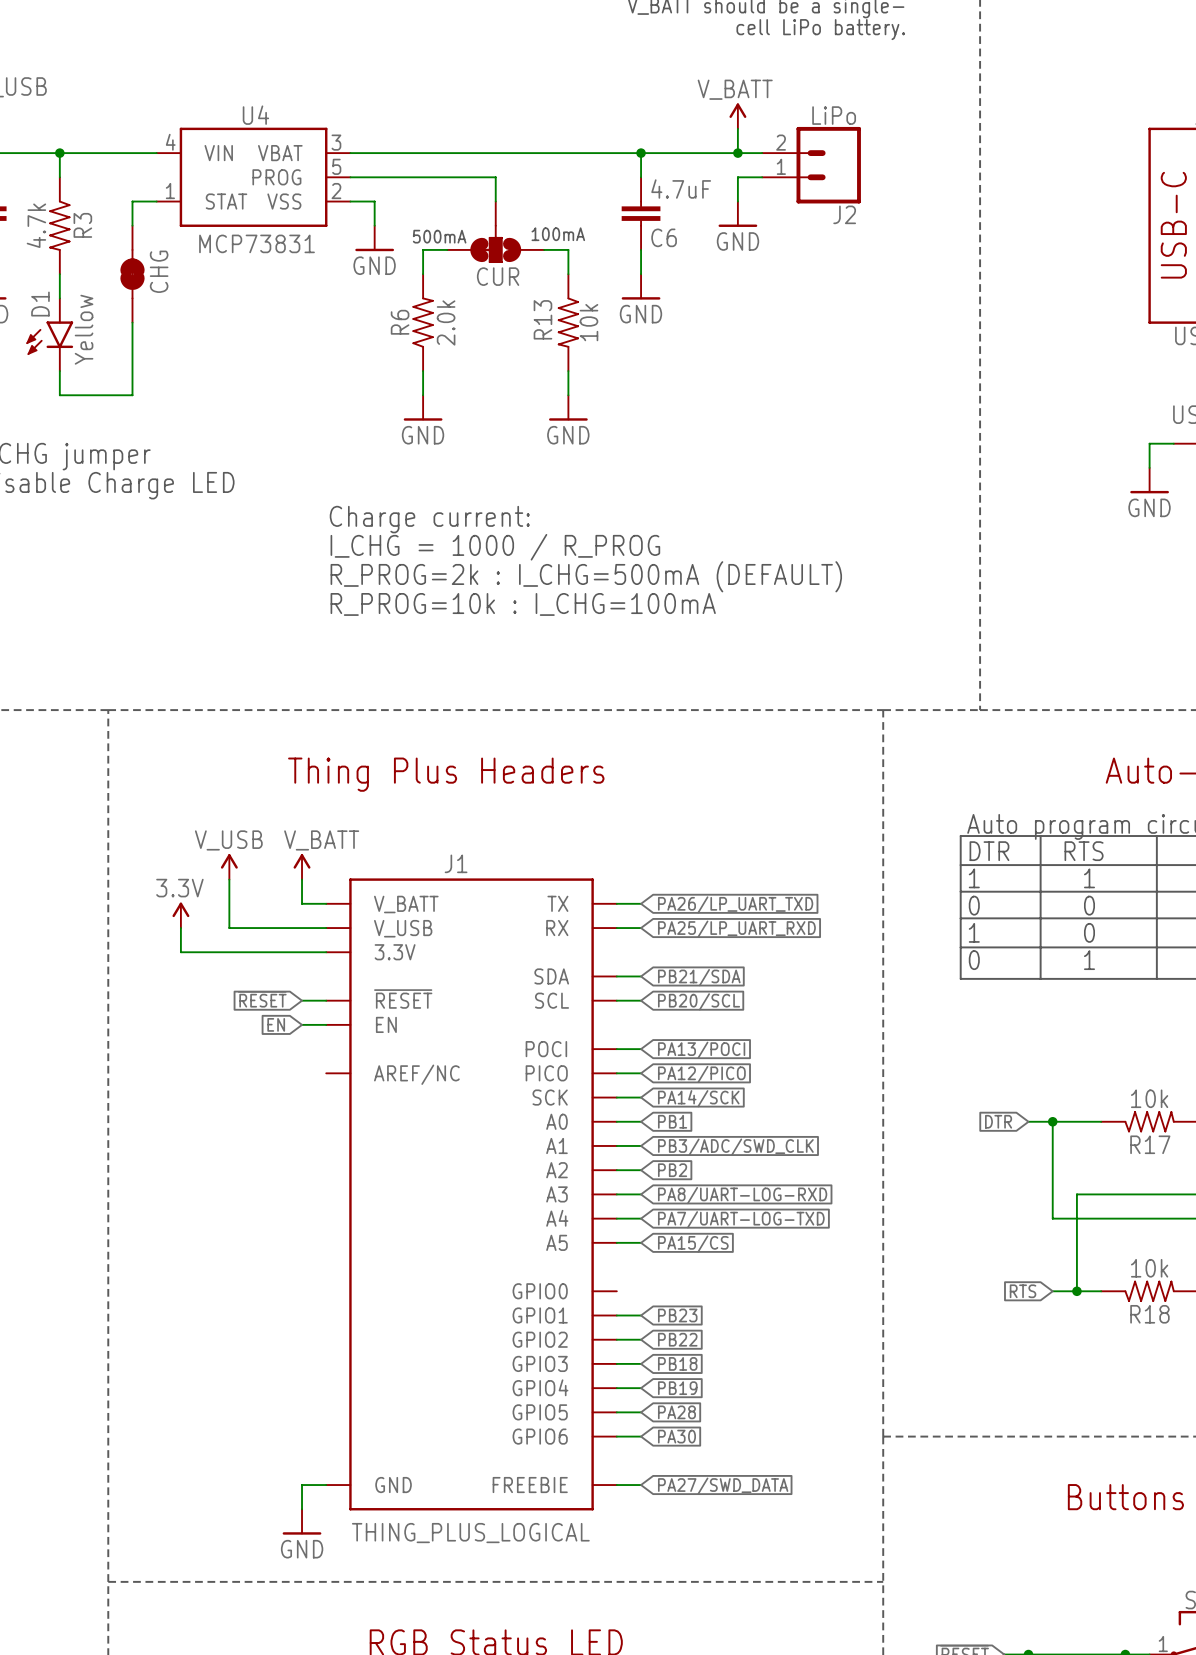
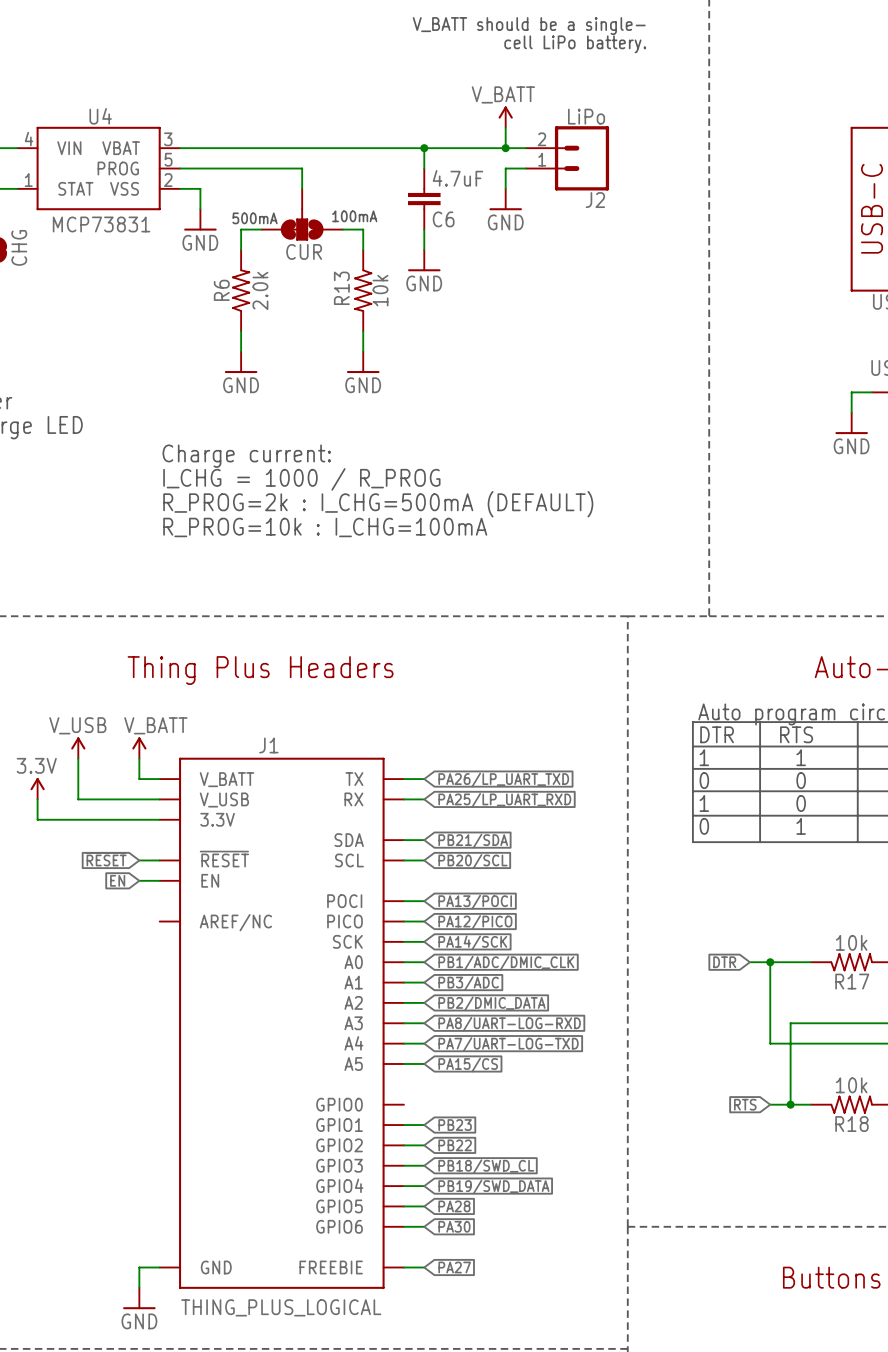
global label: PB1 (672, 1121) -> PB1/ADC/DMIC_CLK (506, 963)
global label: PB3/ADC/SWD_CLK (735, 1147) -> PB3/ADC (468, 983)
global label: PB2 (672, 1170) -> PB2/DMIC_DATA (491, 1003)
global label: PB18 (677, 1363) -> PB18/SWD_CL (486, 1166)
global label: PB19 (677, 1388) -> PB19/SWD_DATA (493, 1187)
global label: PA27/SWD_DATA (723, 1486) -> PA27 (454, 1267)

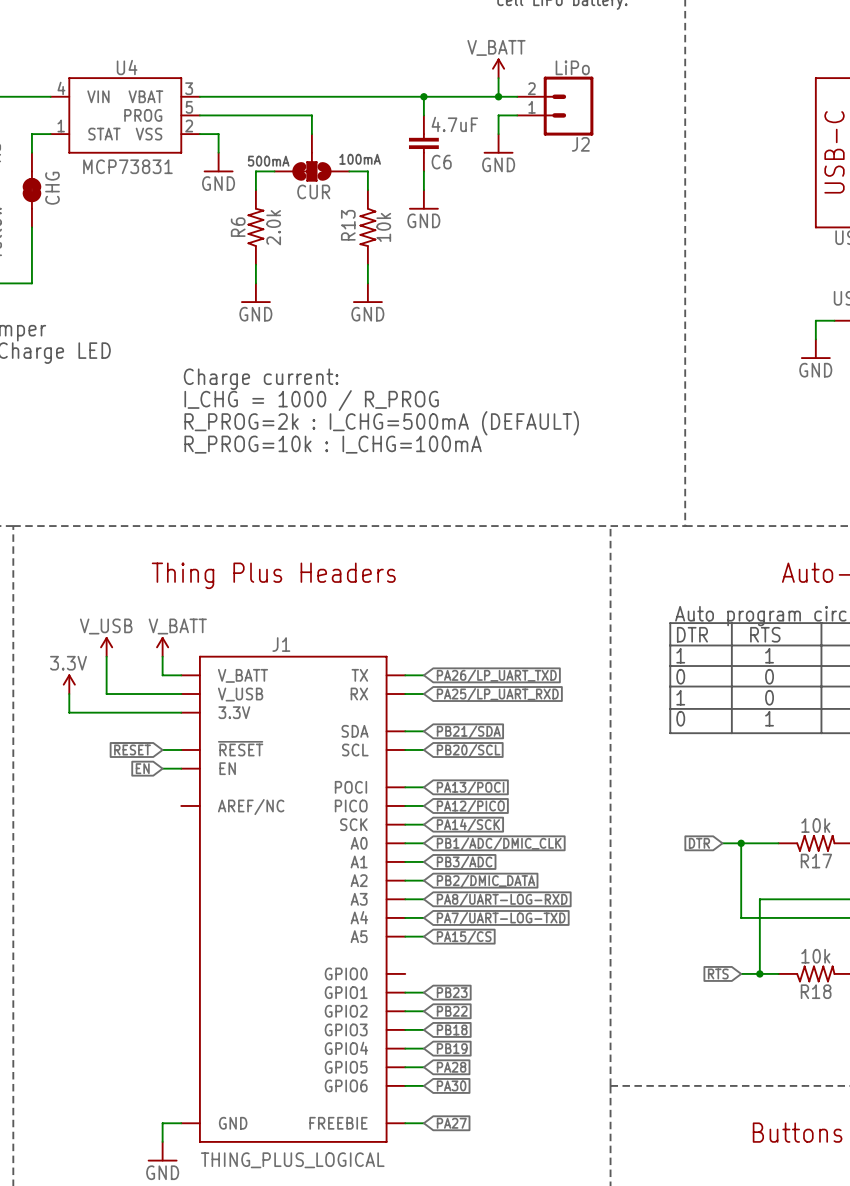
global label: PB18/SWD_CL (486, 1166) -> PB18 (452, 1029)
global label: PB19/SWD_DATA (493, 1187) -> PB19 (452, 1048)

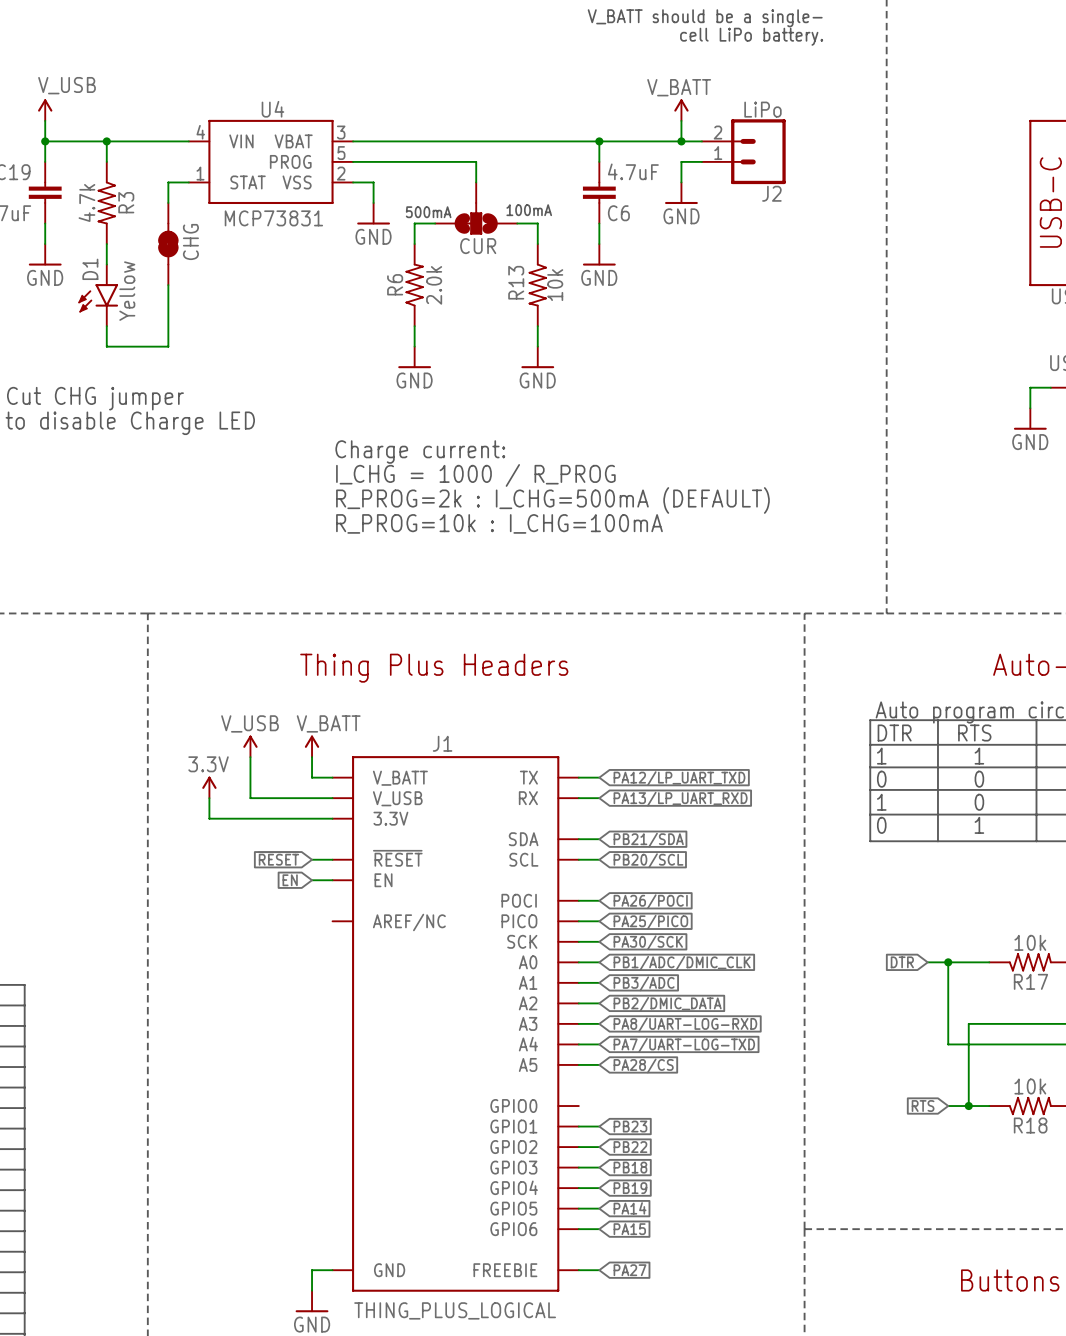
global label: PA26/LP_UART_TXD (496, 676) -> PA12/LP_UART_TXD (679, 778)
global label: PA25/LP_UART_RXD (497, 694) -> PA13/LP_UART_RXD (680, 799)
global label: PA13/POCI (470, 788) -> PA26/POCI (650, 901)
global label: PA12/PICO (470, 806) -> PA25/PICO (650, 922)
global label: PA14/SCK (468, 825) -> PA30/SCK (648, 942)
global label: PA15/CS (464, 937) -> PA28/CS (643, 1065)
global label: PA28 (451, 1067) -> PA14 (630, 1208)
global label: PA30 (451, 1085) -> PA15 (629, 1229)

